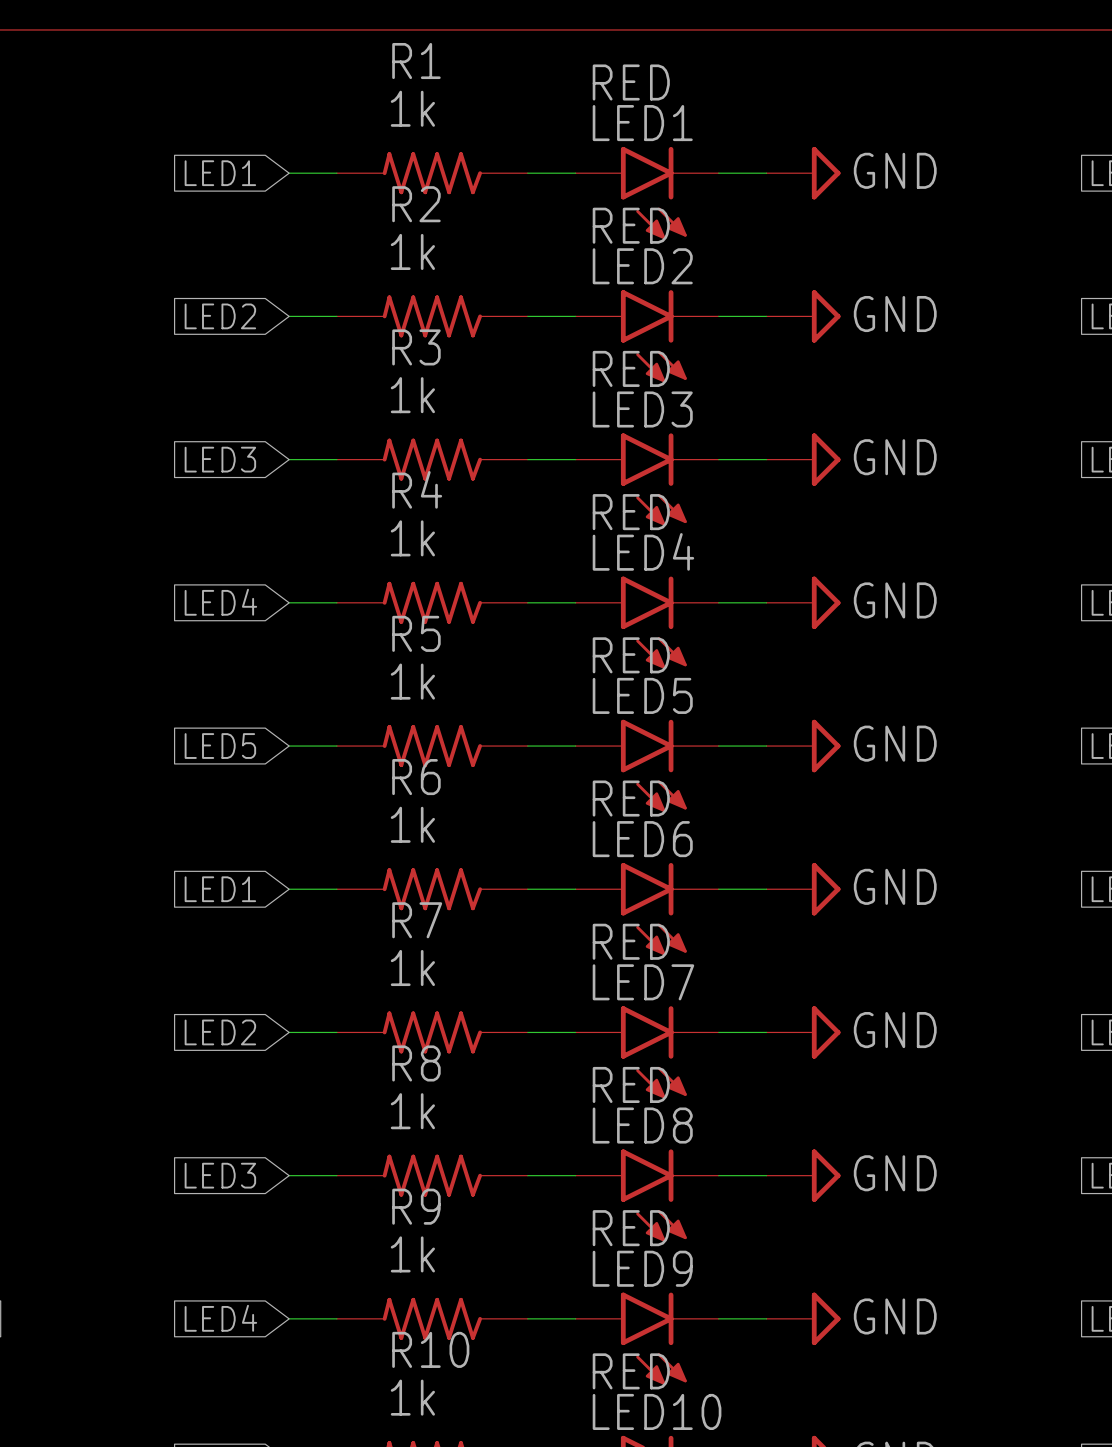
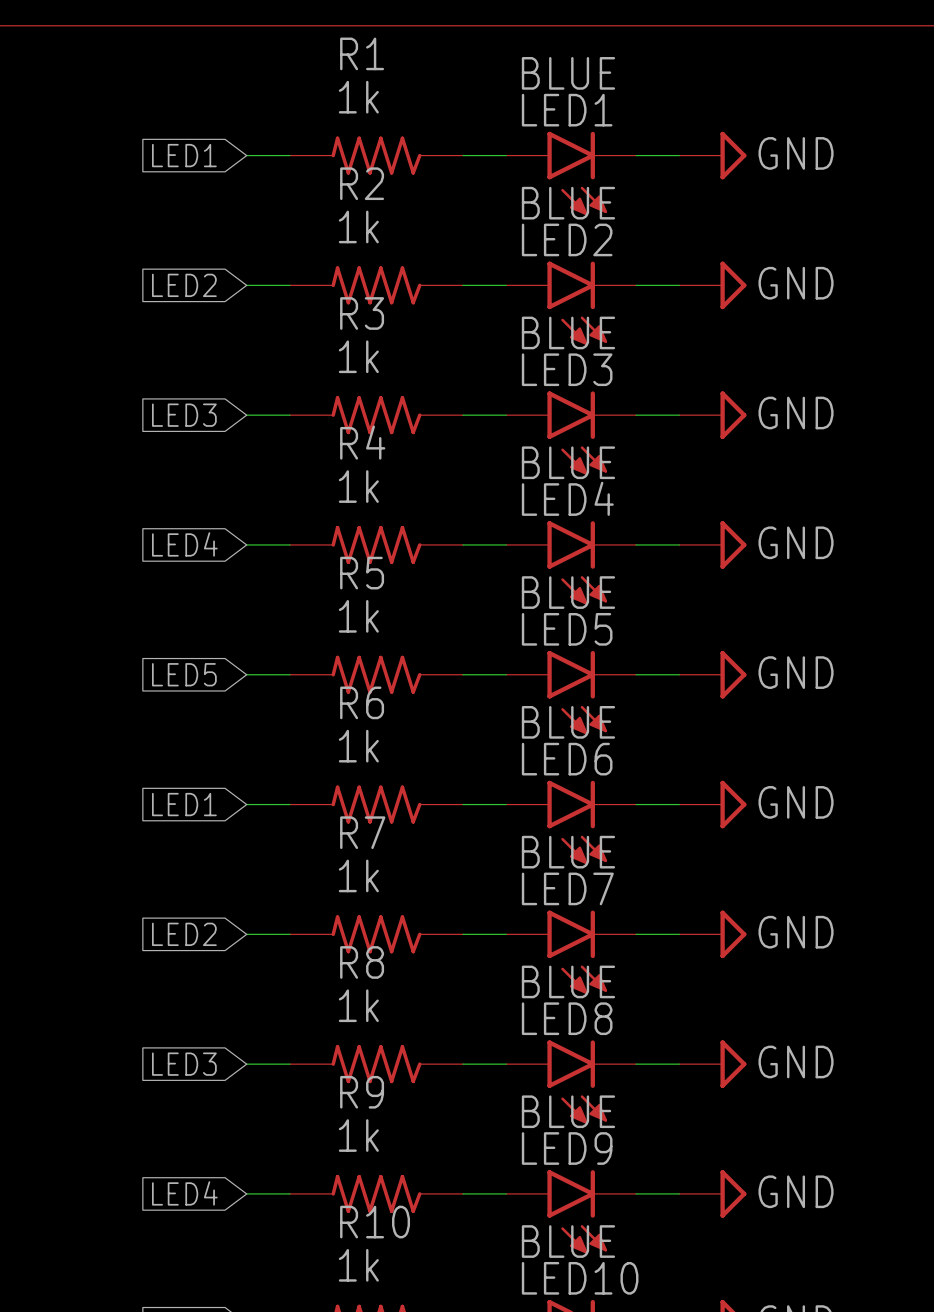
LED1 value: RED (631, 82) -> BLUE (568, 73)
LED2 value: RED (631, 225) -> BLUE (568, 203)
LED3 value: RED (631, 368) -> BLUE (568, 332)
LED4 value: RED (631, 512) -> BLUE (568, 462)
LED5 value: RED (631, 655) -> BLUE (568, 592)
LED6 value: RED (631, 798) -> BLUE (568, 722)
LED7 value: RED (631, 941) -> BLUE (568, 852)
LED8 value: RED (631, 1084) -> BLUE (568, 981)
LED9 value: RED (631, 1228) -> BLUE (568, 1111)
LED10 value: RED (631, 1371) -> BLUE (568, 1241)

